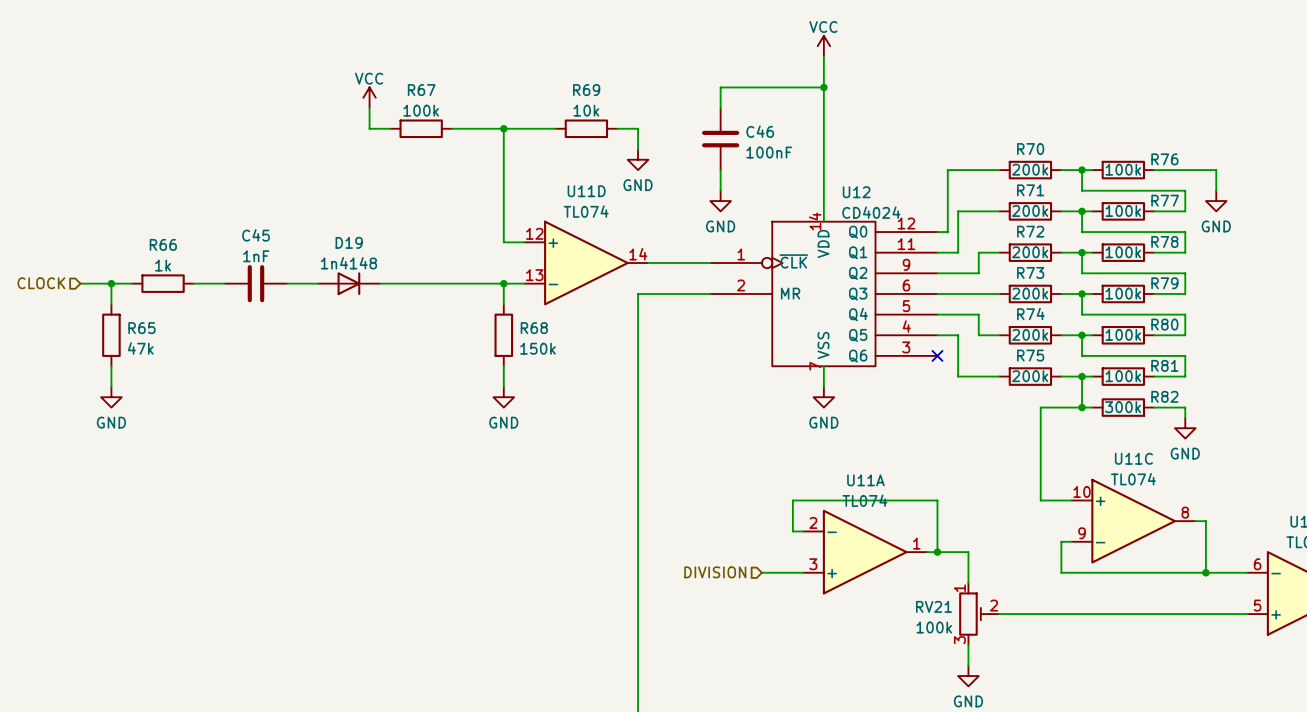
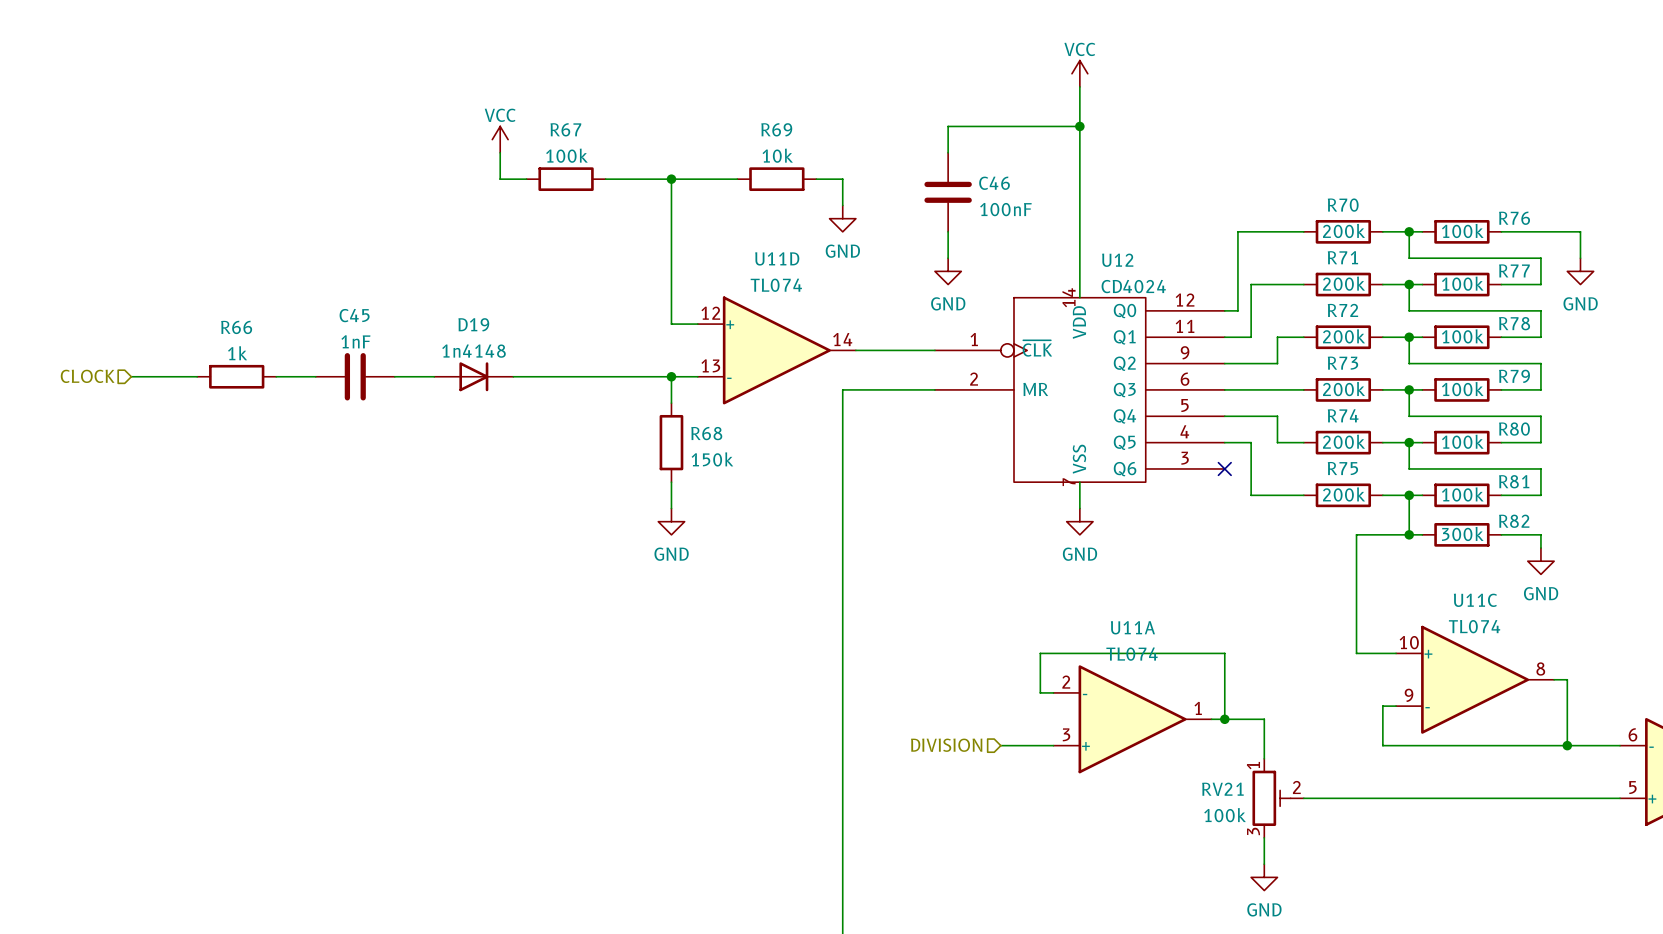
wire: (111, 283) (111, 304) -> none
junction: (111, 283) -> none
R65: 47k (111, 335) -> none
wire: (111, 366) (111, 386) -> none
power symbol: GND (111, 397) -> none

